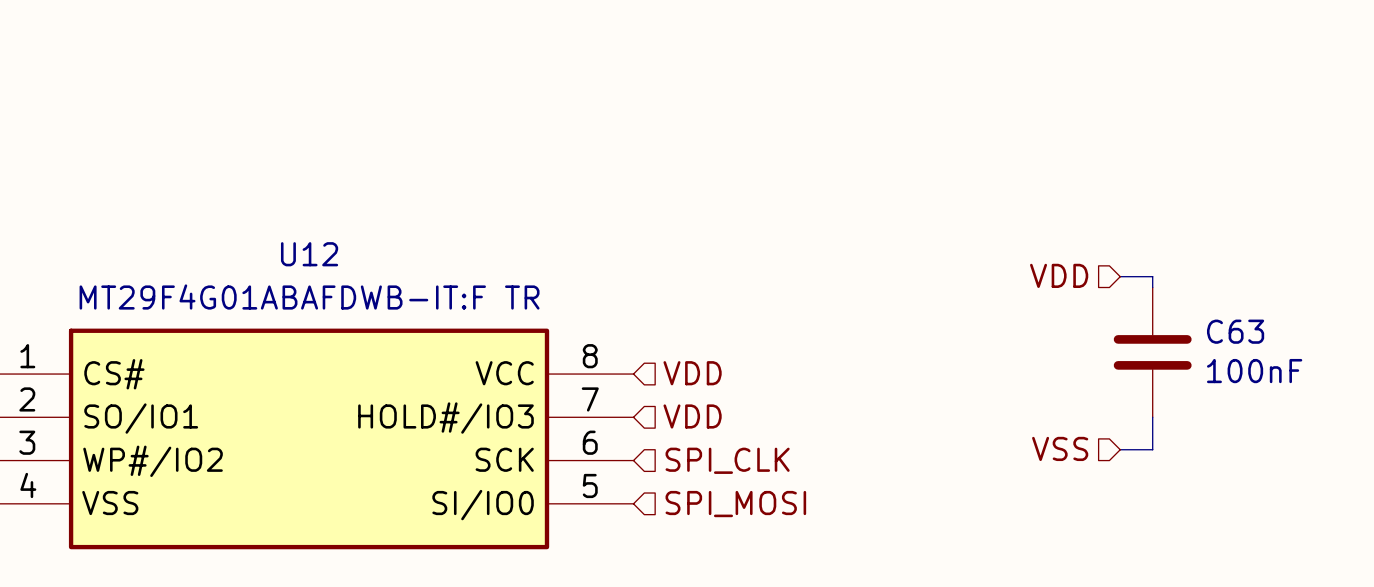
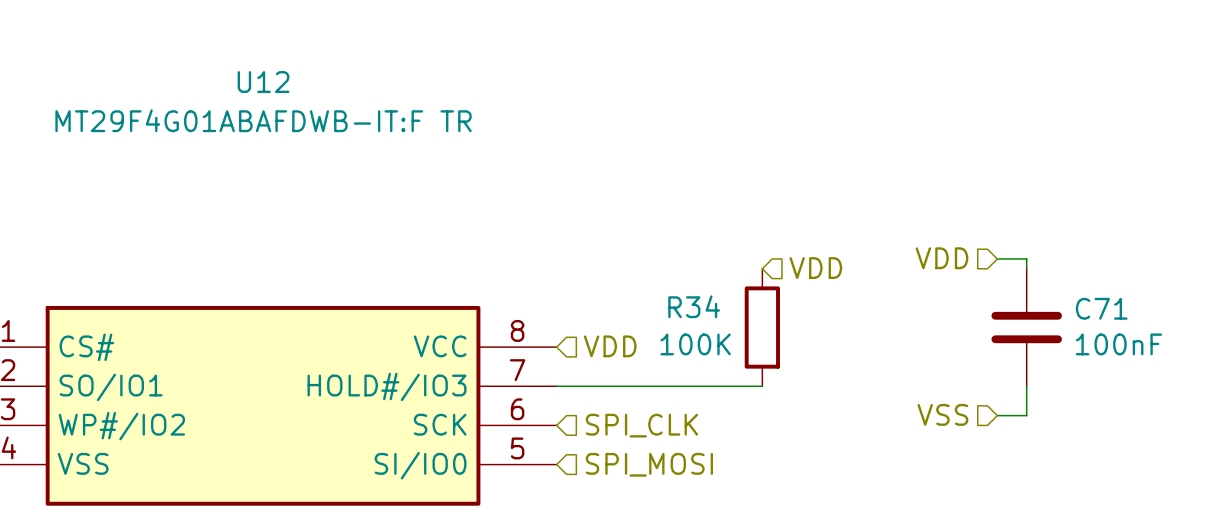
U12 name position: U12 (309, 254) -> U12 (263, 82)
U12 value position: MT29F4G01ABAFDWB-IT:F TR (309, 296) -> MT29F4G01ABAFDWB-IT:F TR (263, 120)
C63 name: C63 (1235, 331) -> C71 (1101, 308)
R34: none -> 100K (762, 327)
hierarchical label position: VDD (692, 416) -> VDD (815, 268)
wire: none -> (556, 386) (762, 386)

